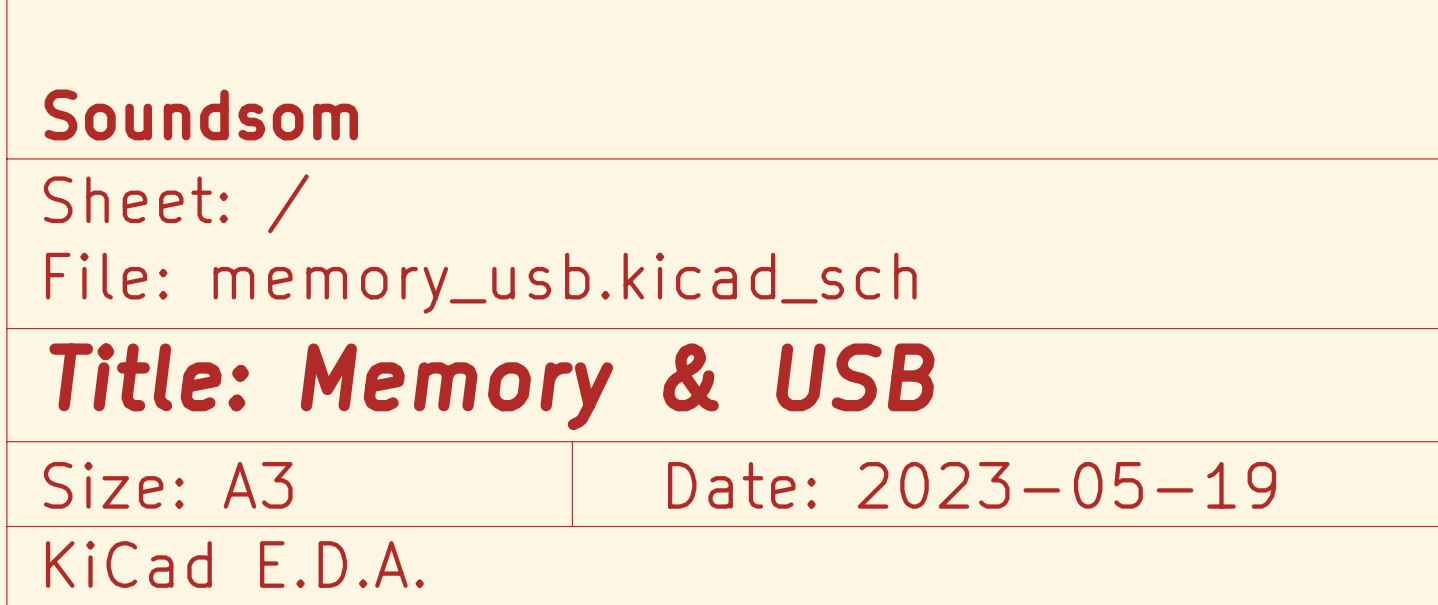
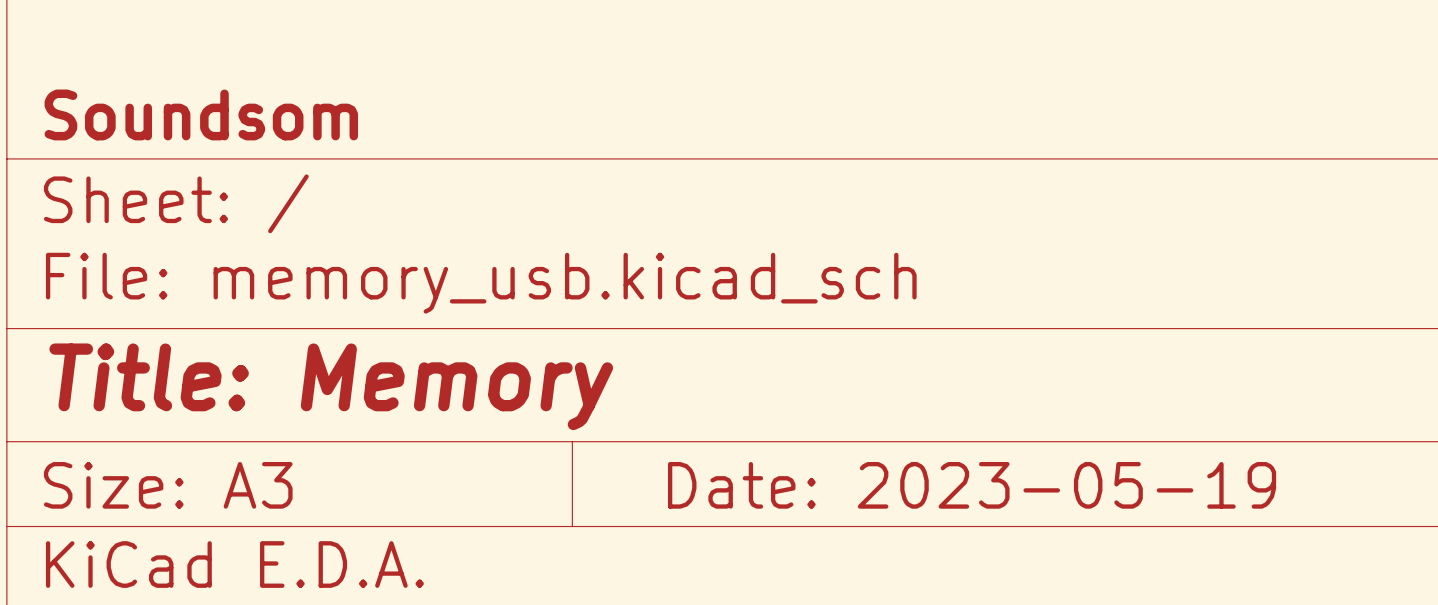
title block: Title: Memory & USB (491, 386) -> Title: Memory (331, 386)

